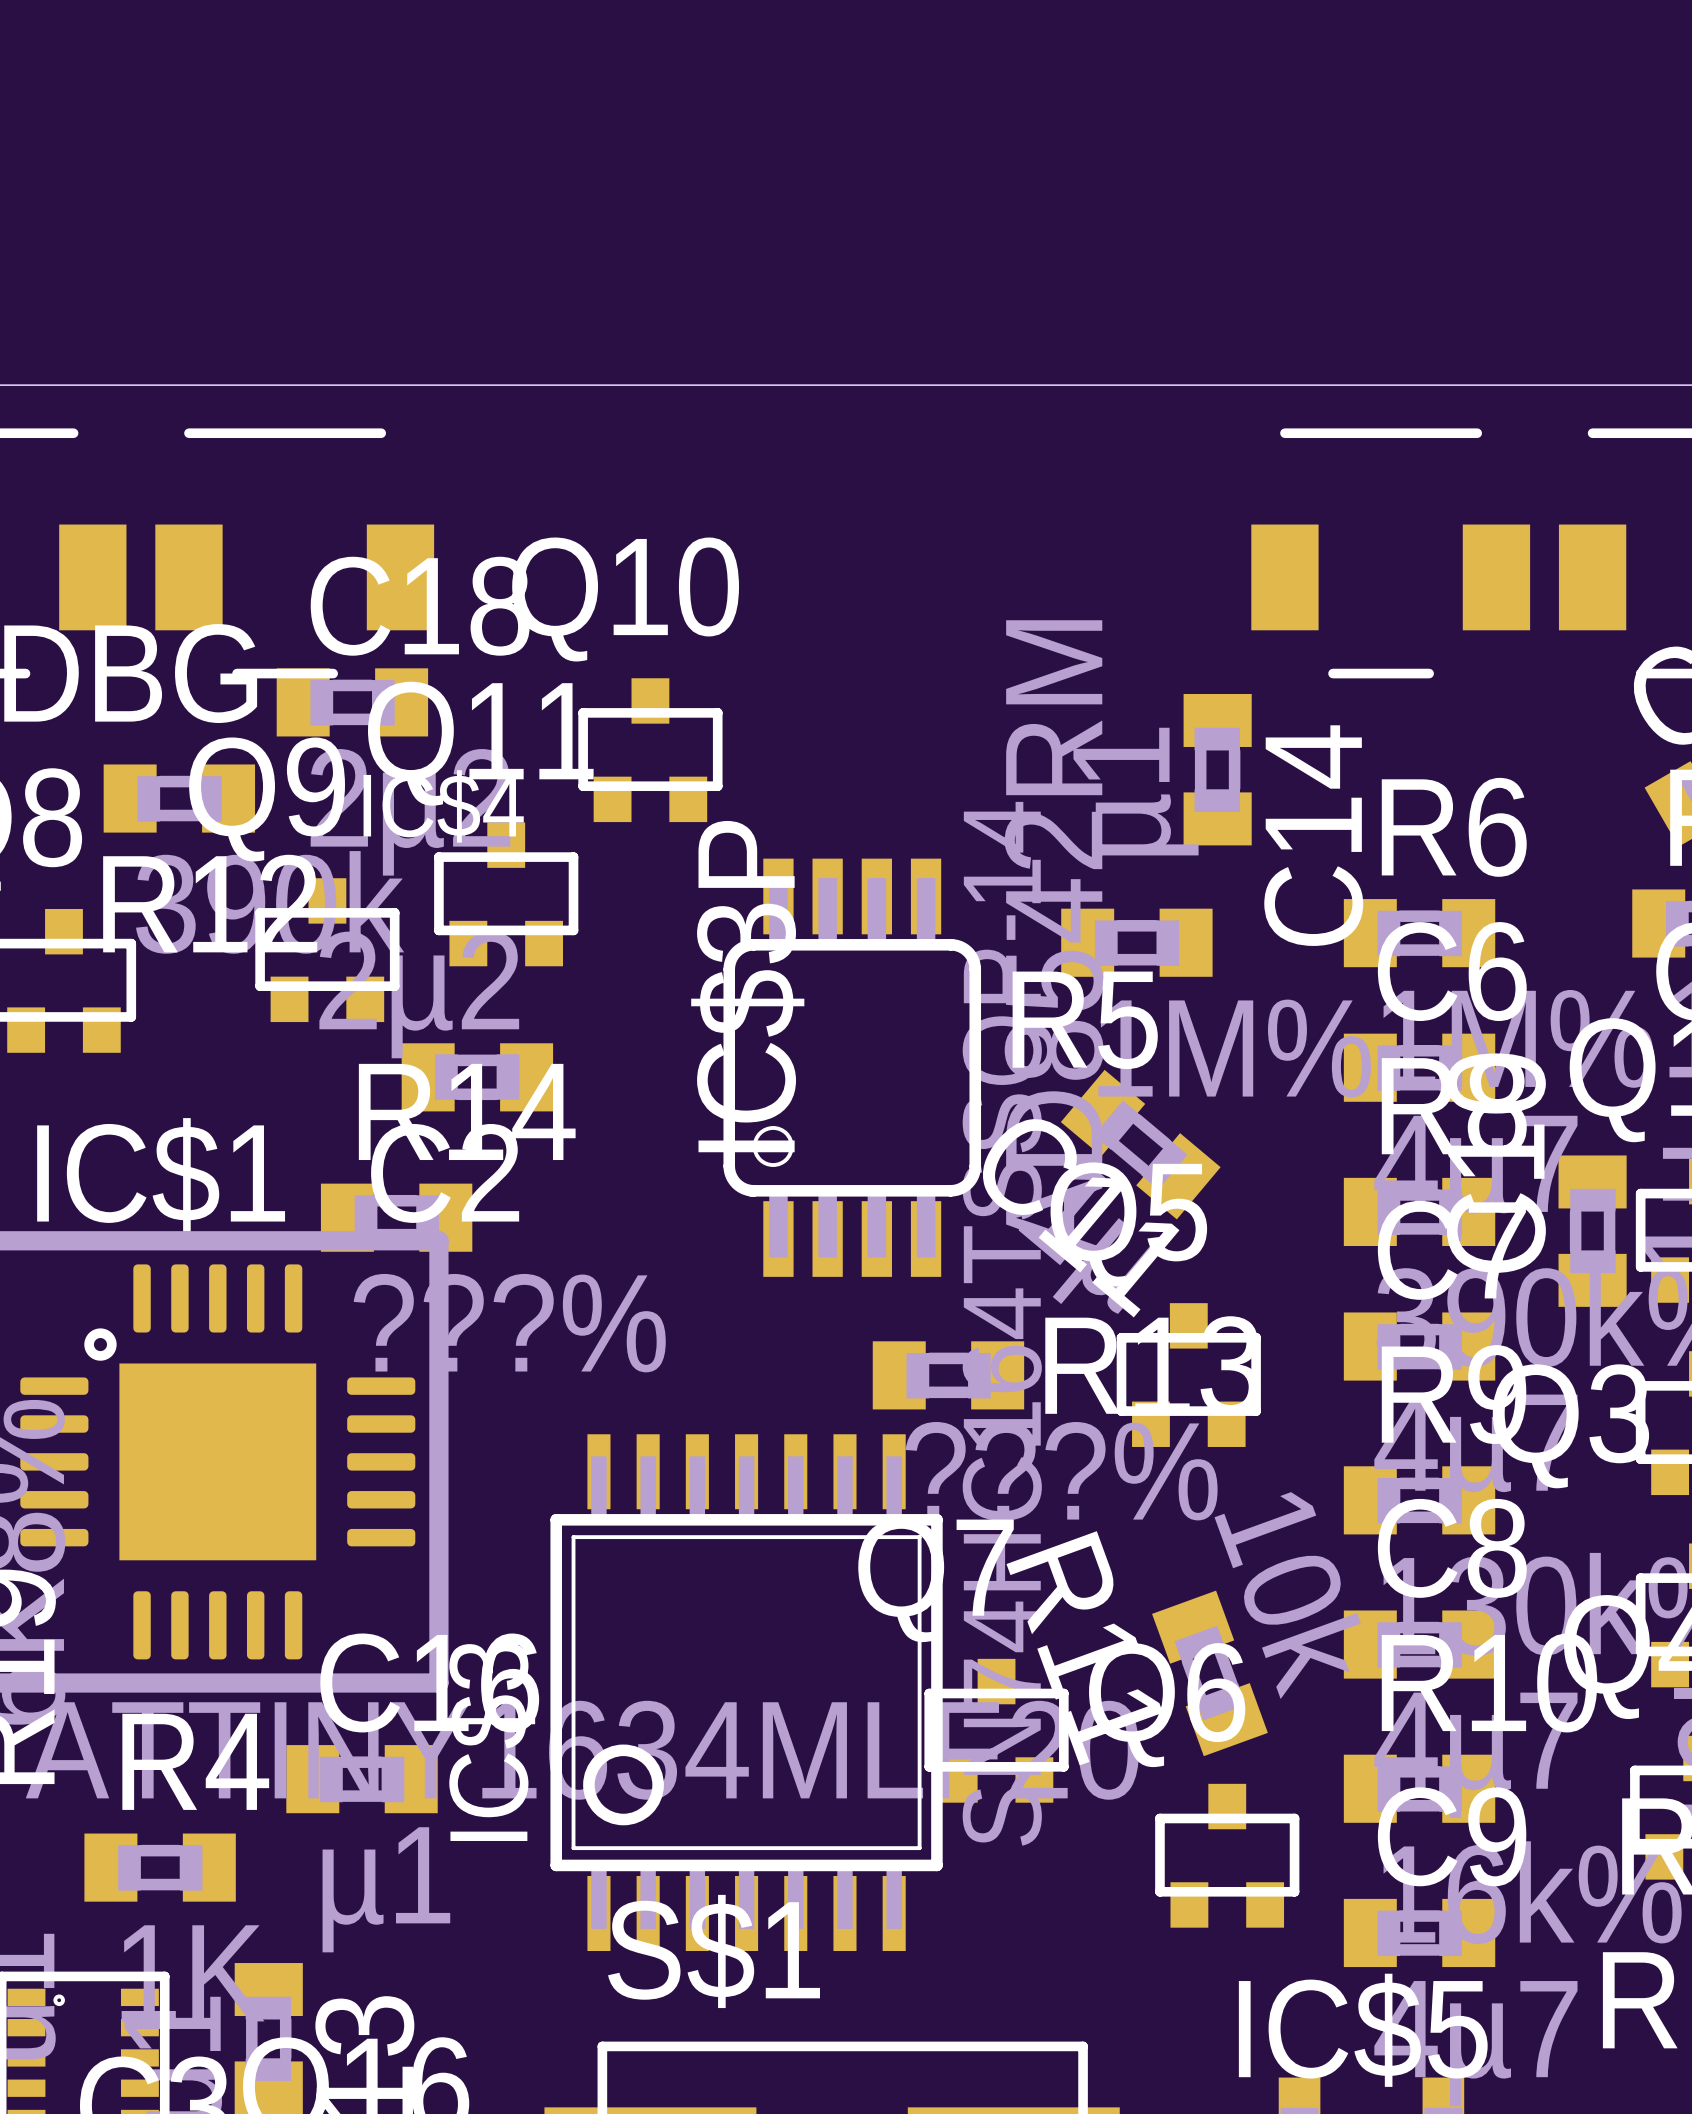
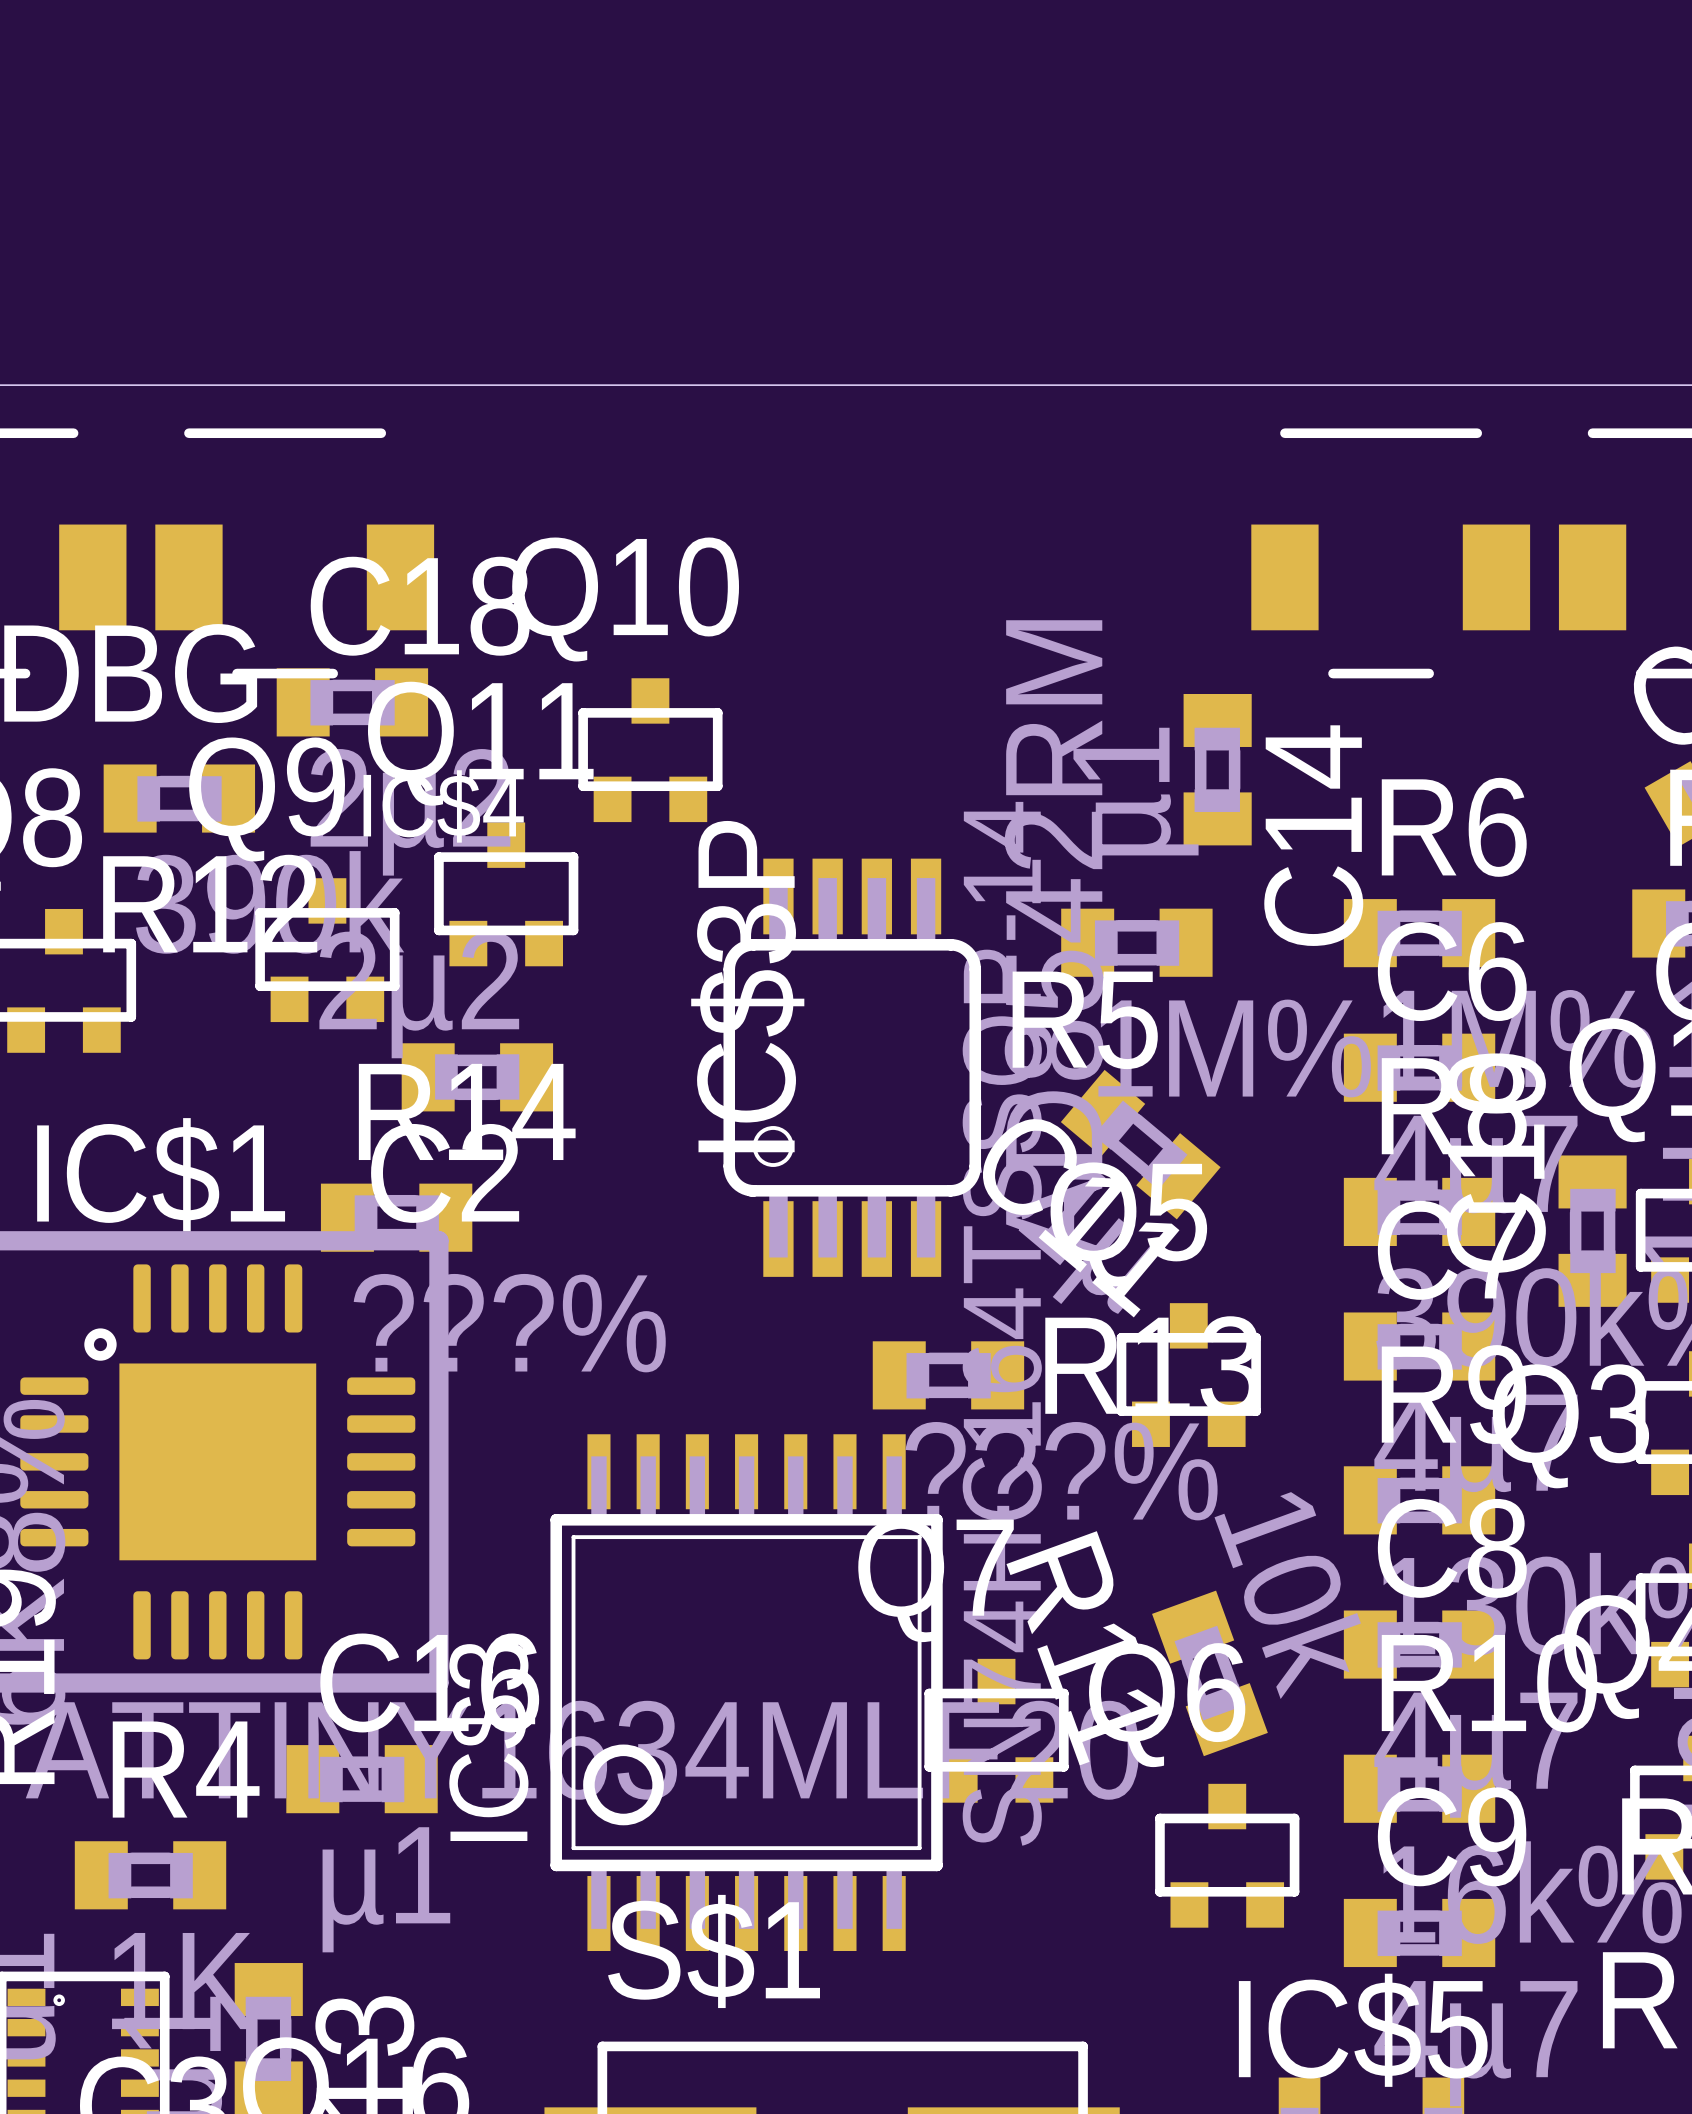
R4 position: (160, 1867) -> (150, 1875)

